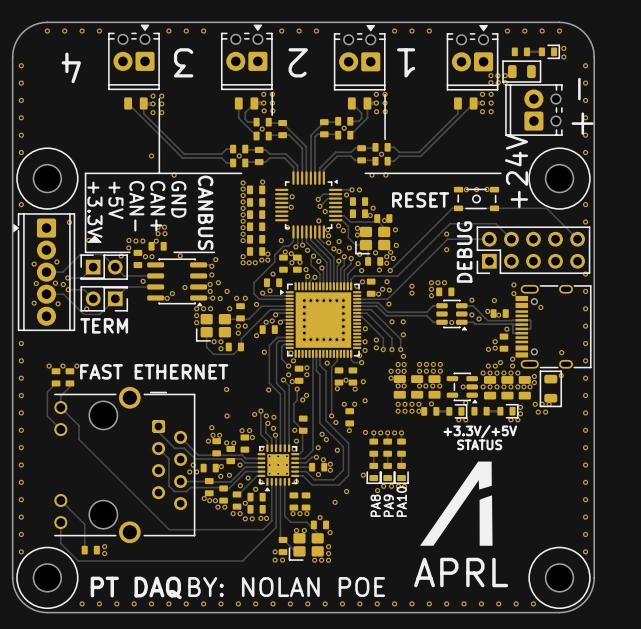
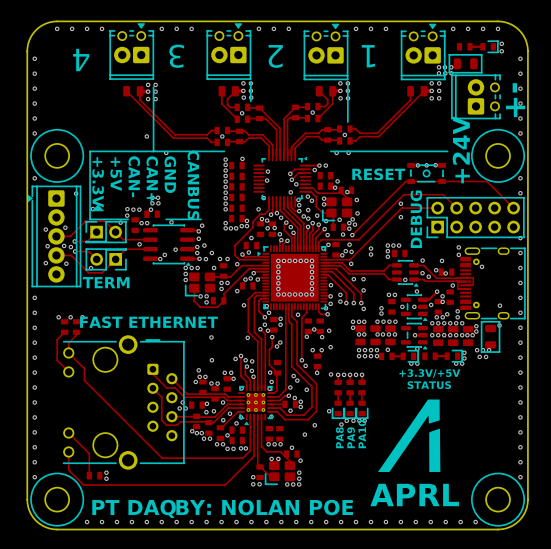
via: none -> (416, 291)
track: none -> (437, 291) (429, 299) (422, 299)
via: none -> (437, 291)
via: none -> (388, 294)
via: none -> (394, 294)
via: (488, 349) -> none
via: none -> (431, 304)
part: none -> (391, 306)
via: none -> (402, 306)
via: none -> (414, 306)
part: none -> (438, 306)
via: none -> (381, 308)
part: none -> (414, 307)
via: none -> (381, 313)
via: (398, 364) -> none
via: (404, 364) -> none
via: (419, 364) -> none
via: (426, 364) -> none
via: (433, 364) -> none
via: (440, 364) -> none

